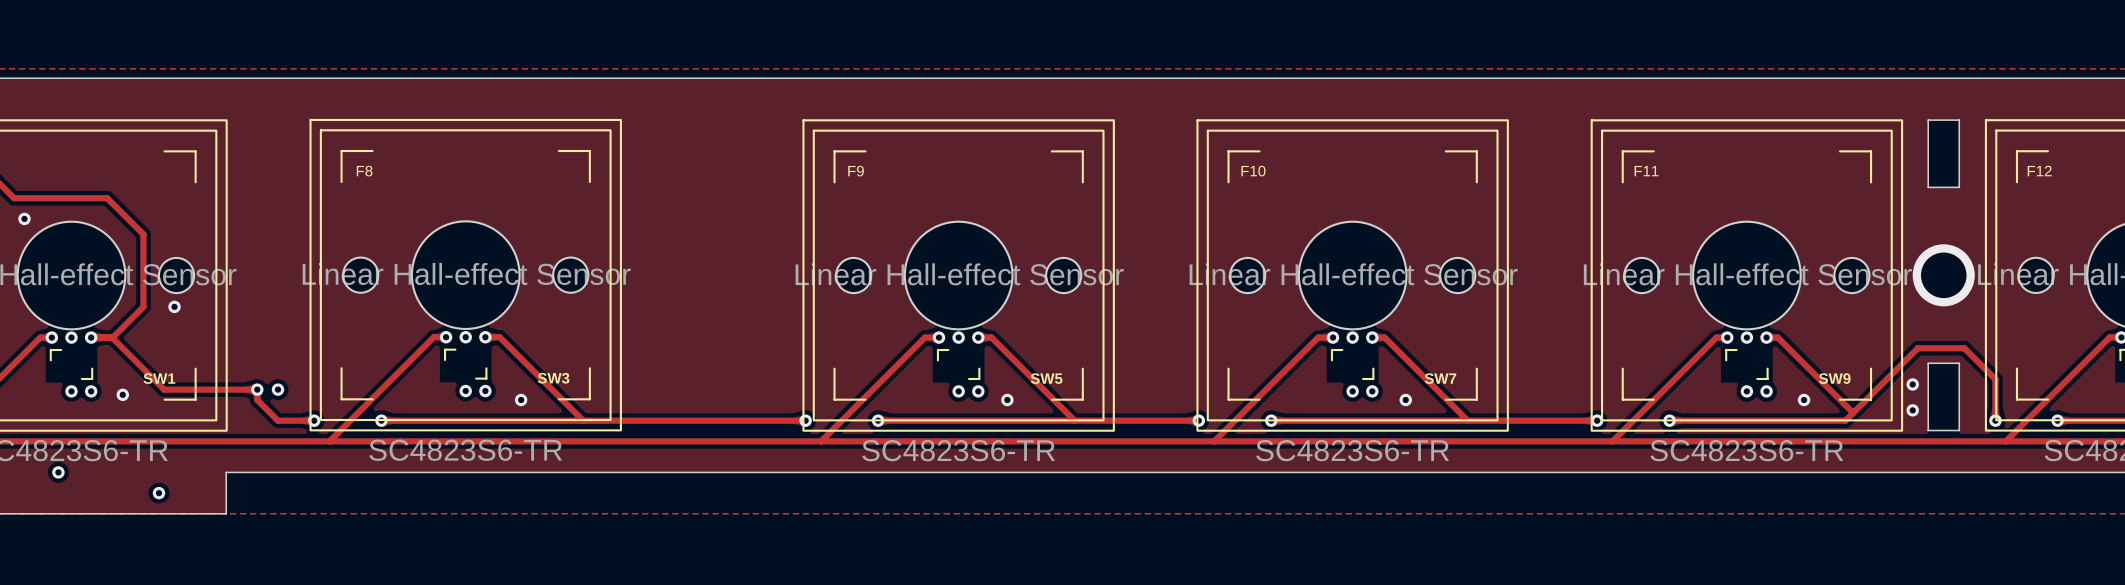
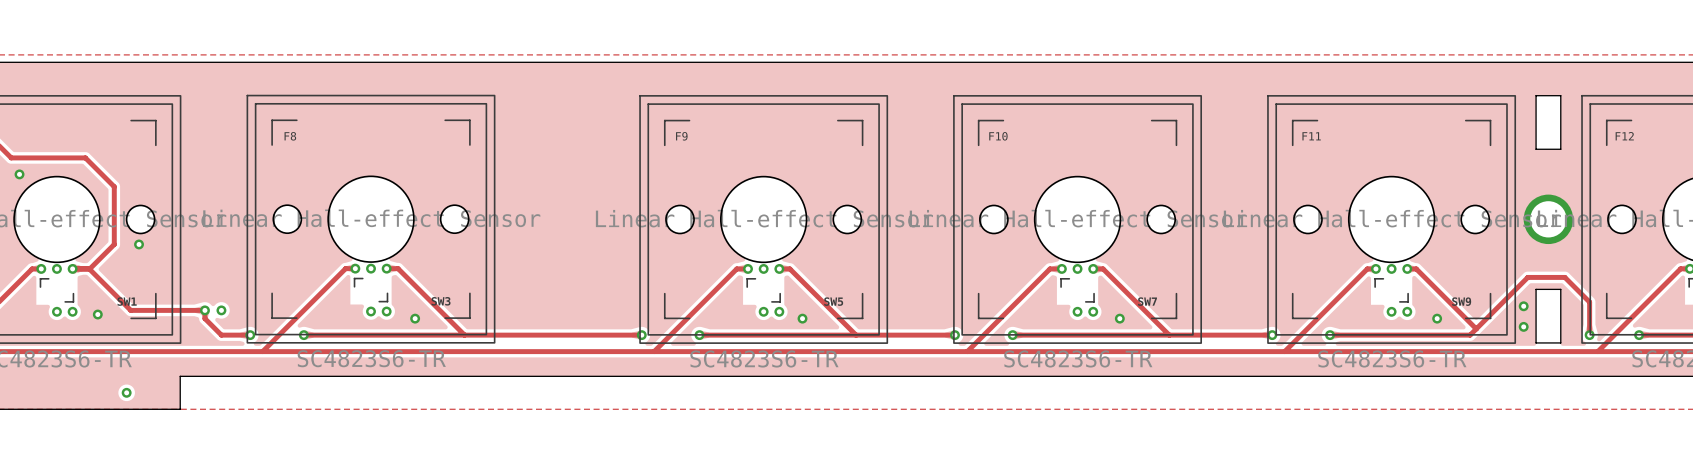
via: (58, 472) -> none

